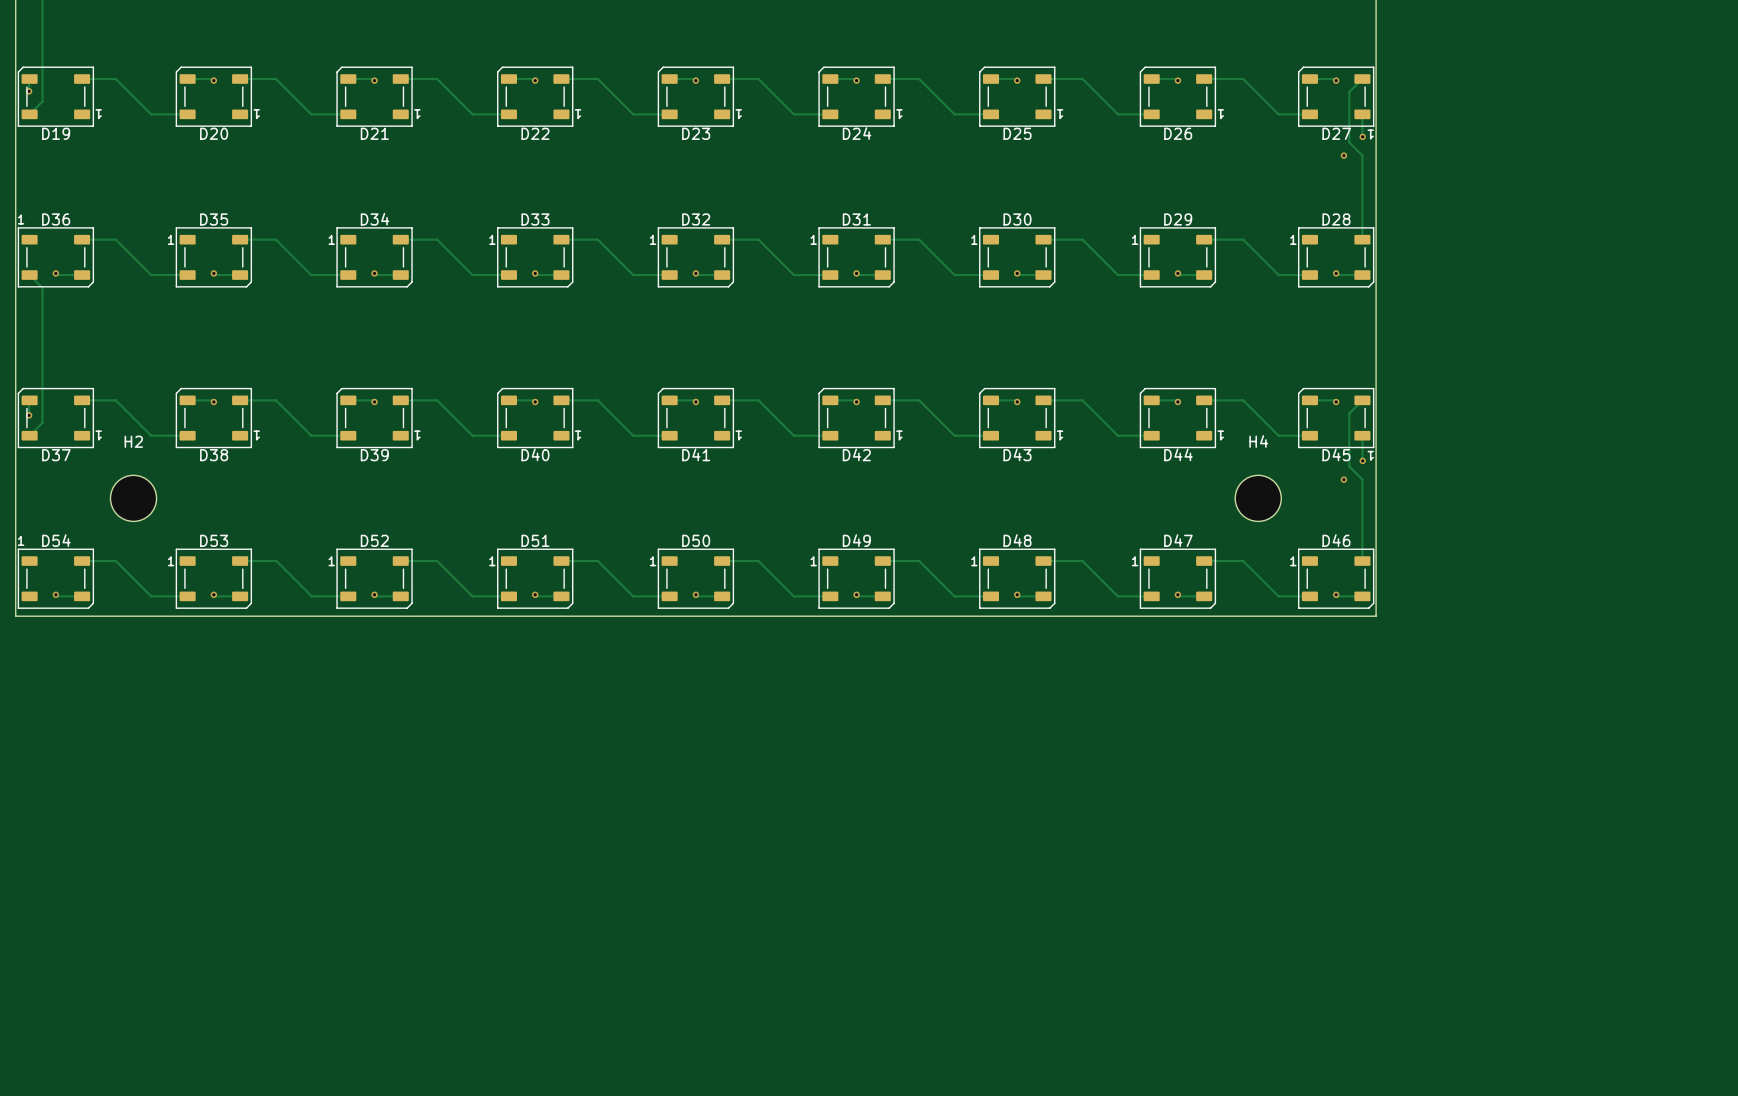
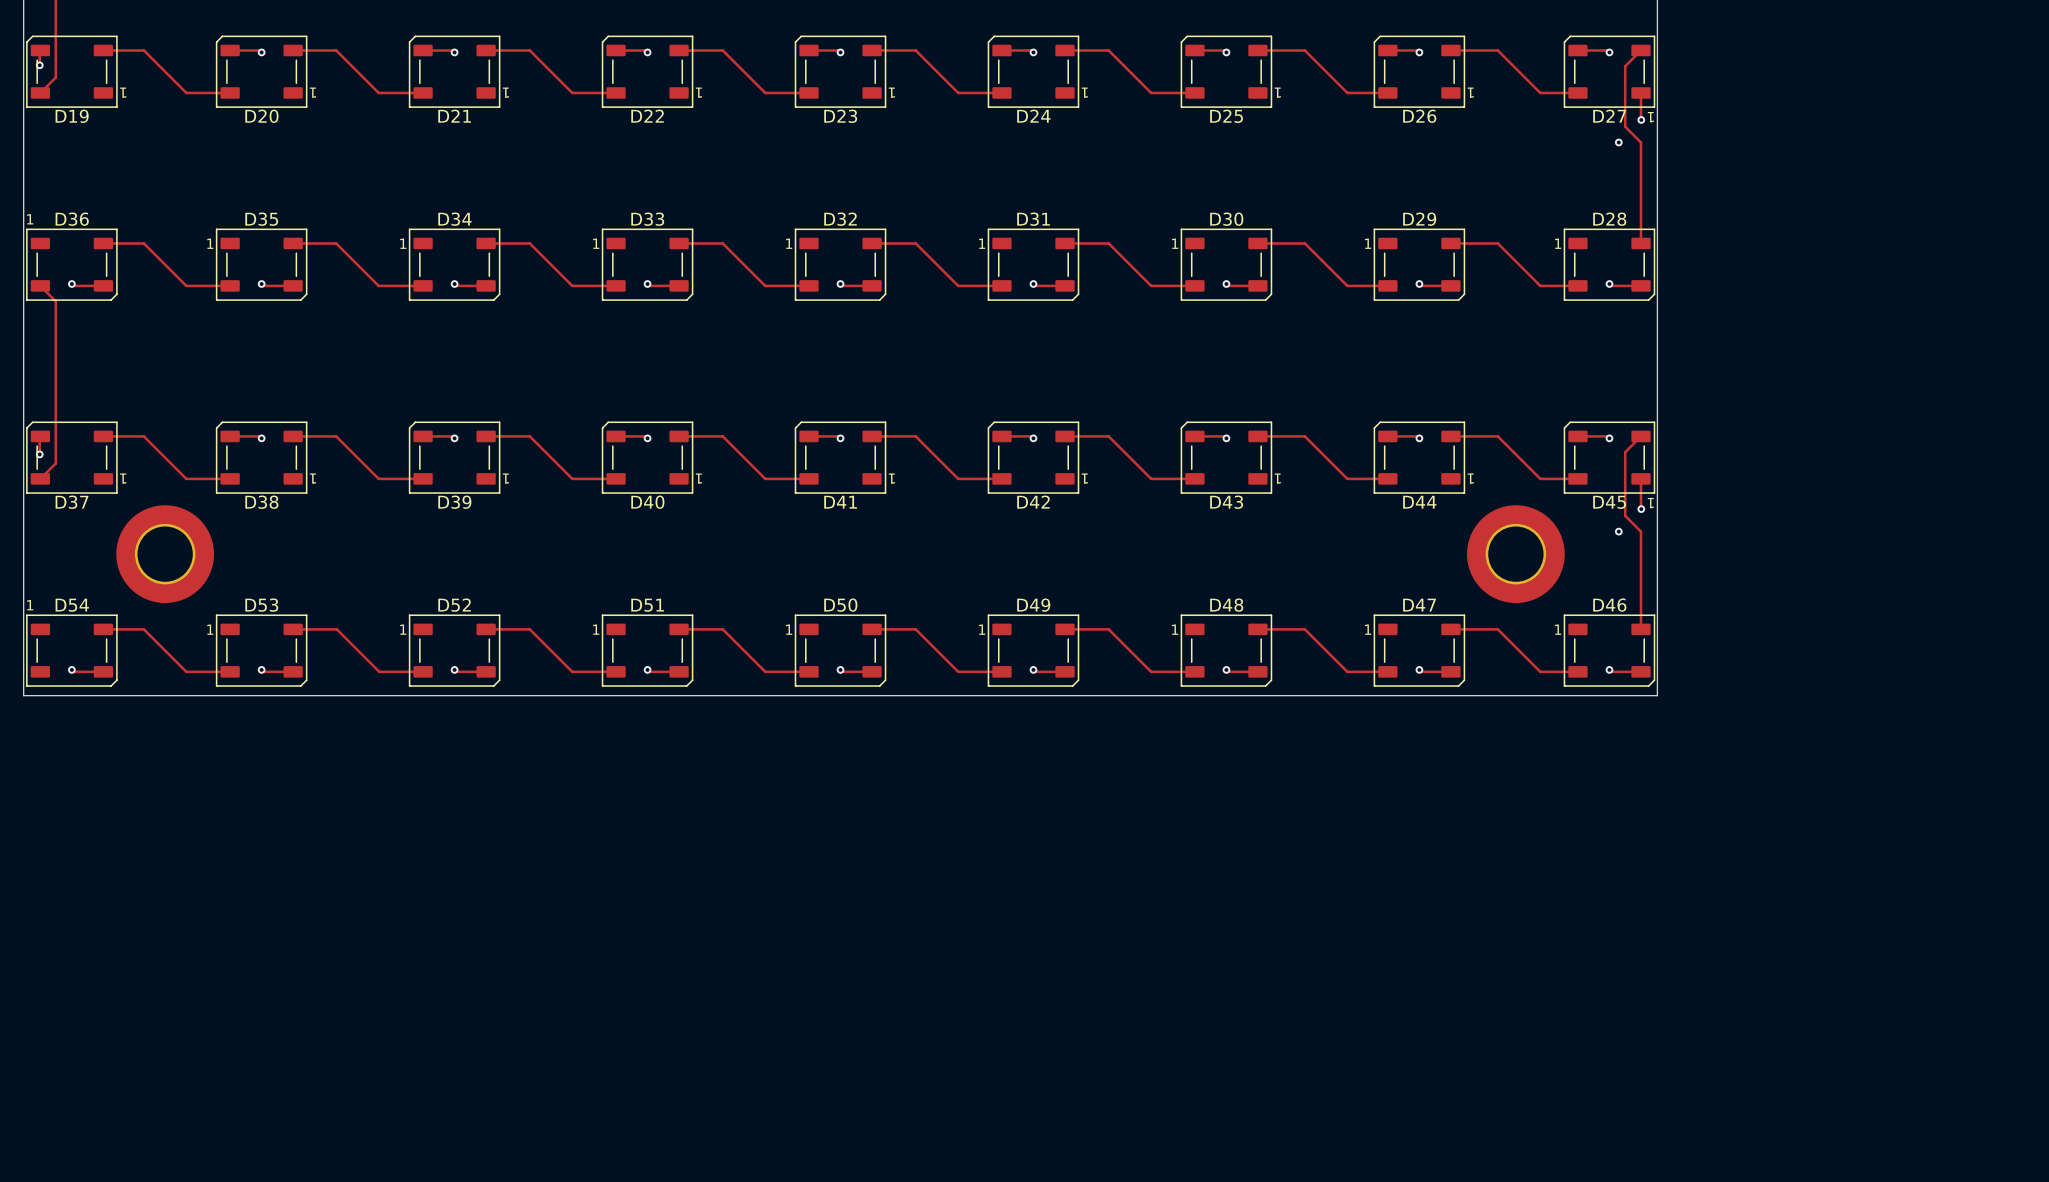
H2: (133, 498) -> none
part: none -> (165, 554)
H4: (1258, 498) -> none
part: none -> (1515, 554)

